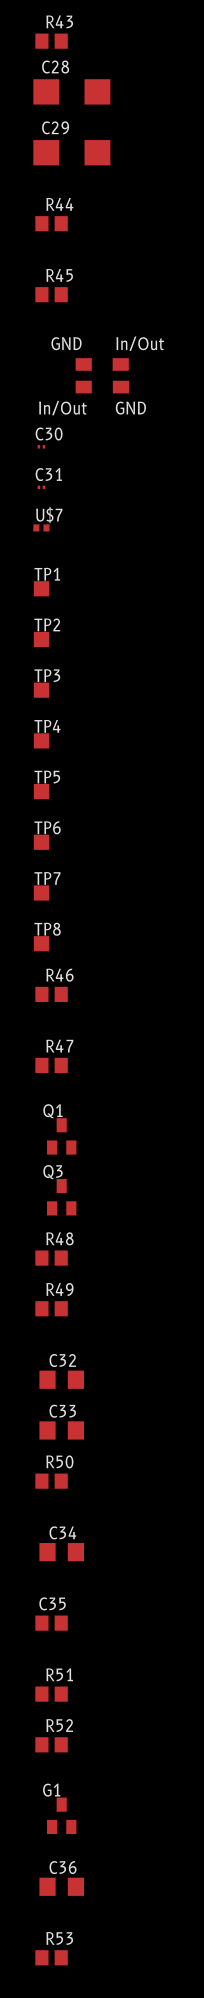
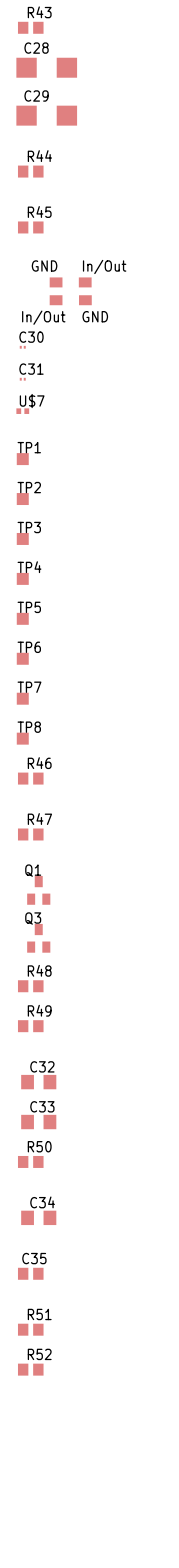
G1: (61, 1815) -> none
C36: (61, 1886) -> none
R53: (51, 1957) -> none

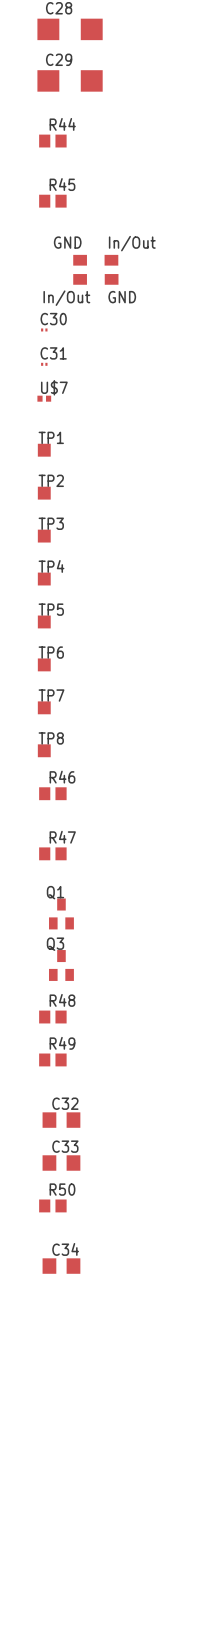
C35: (30, 1273) -> none
R51: (30, 1329) -> none
R52: (30, 1369) -> none

